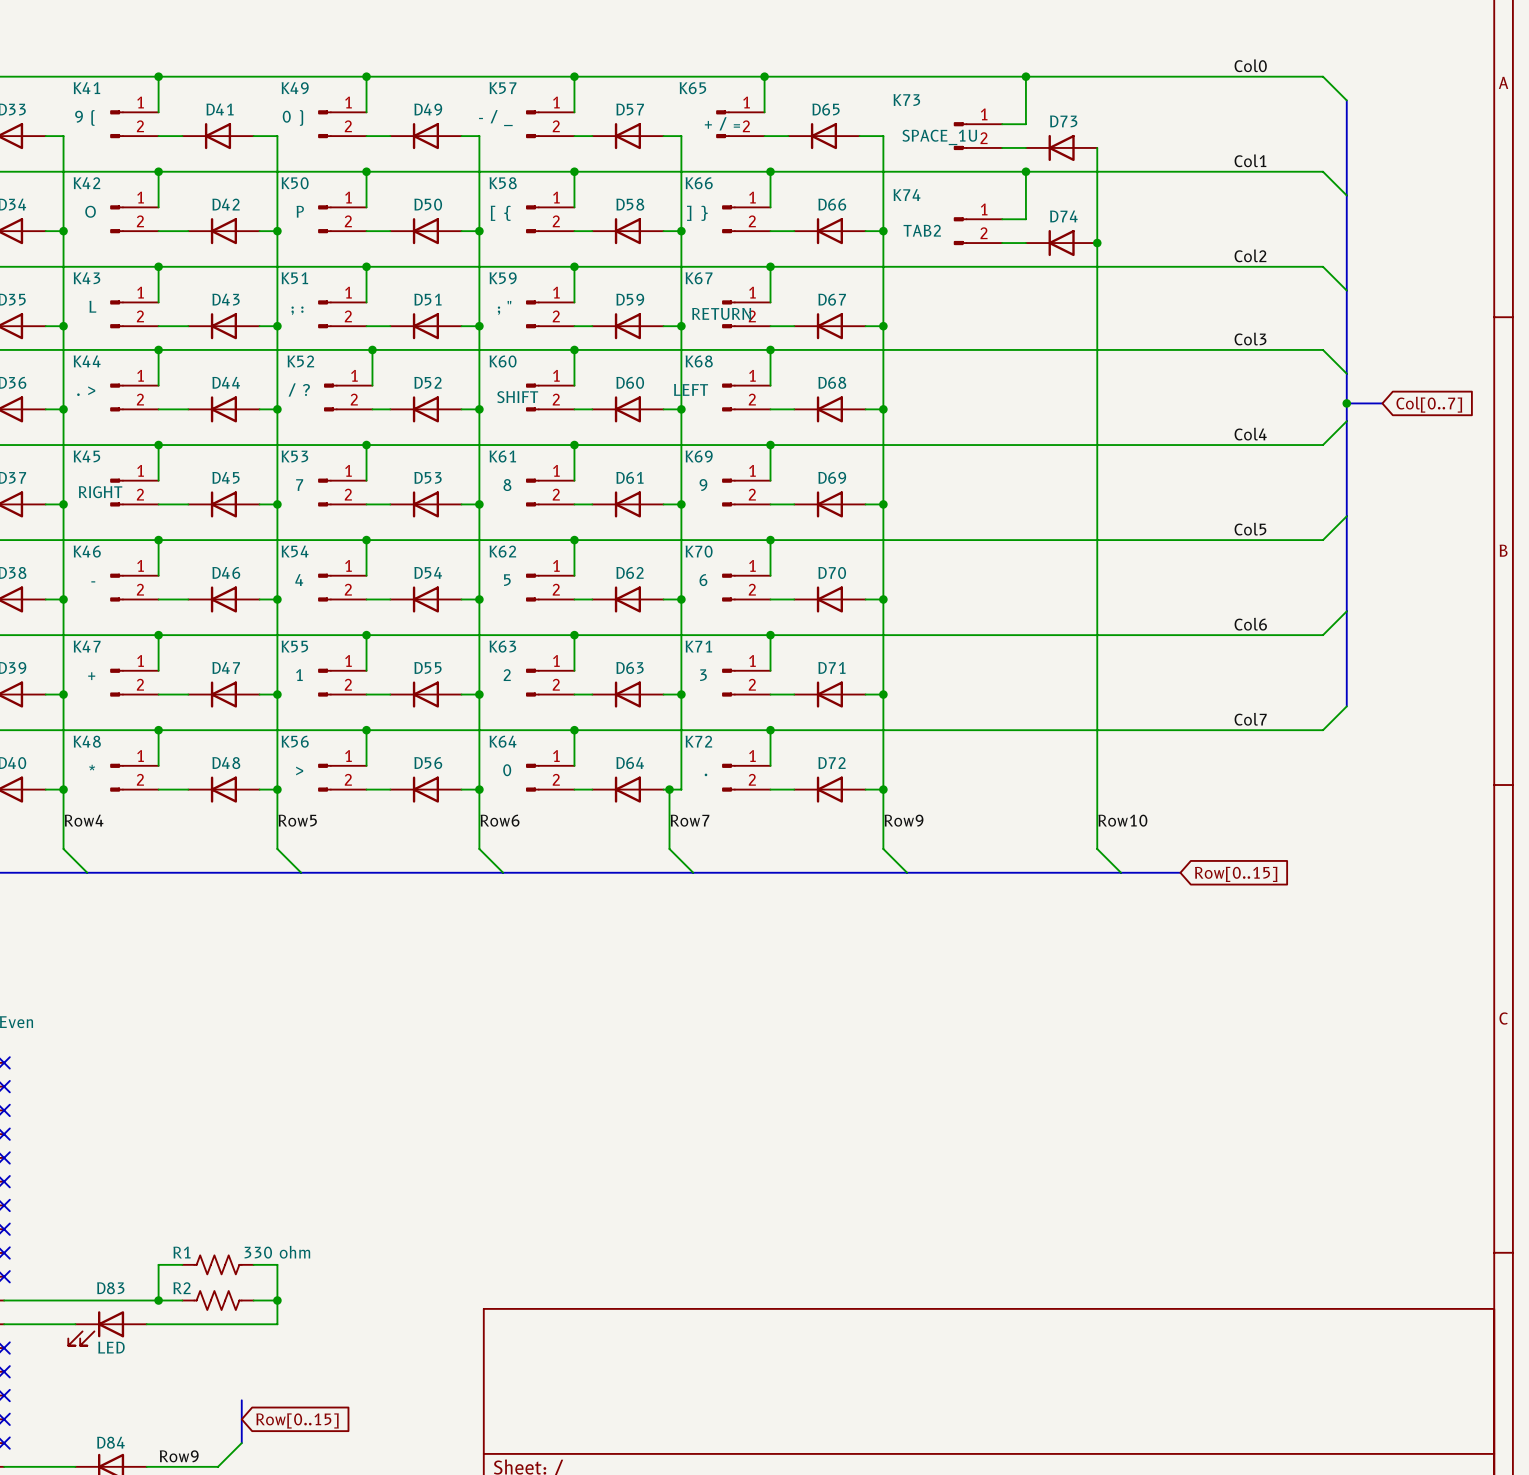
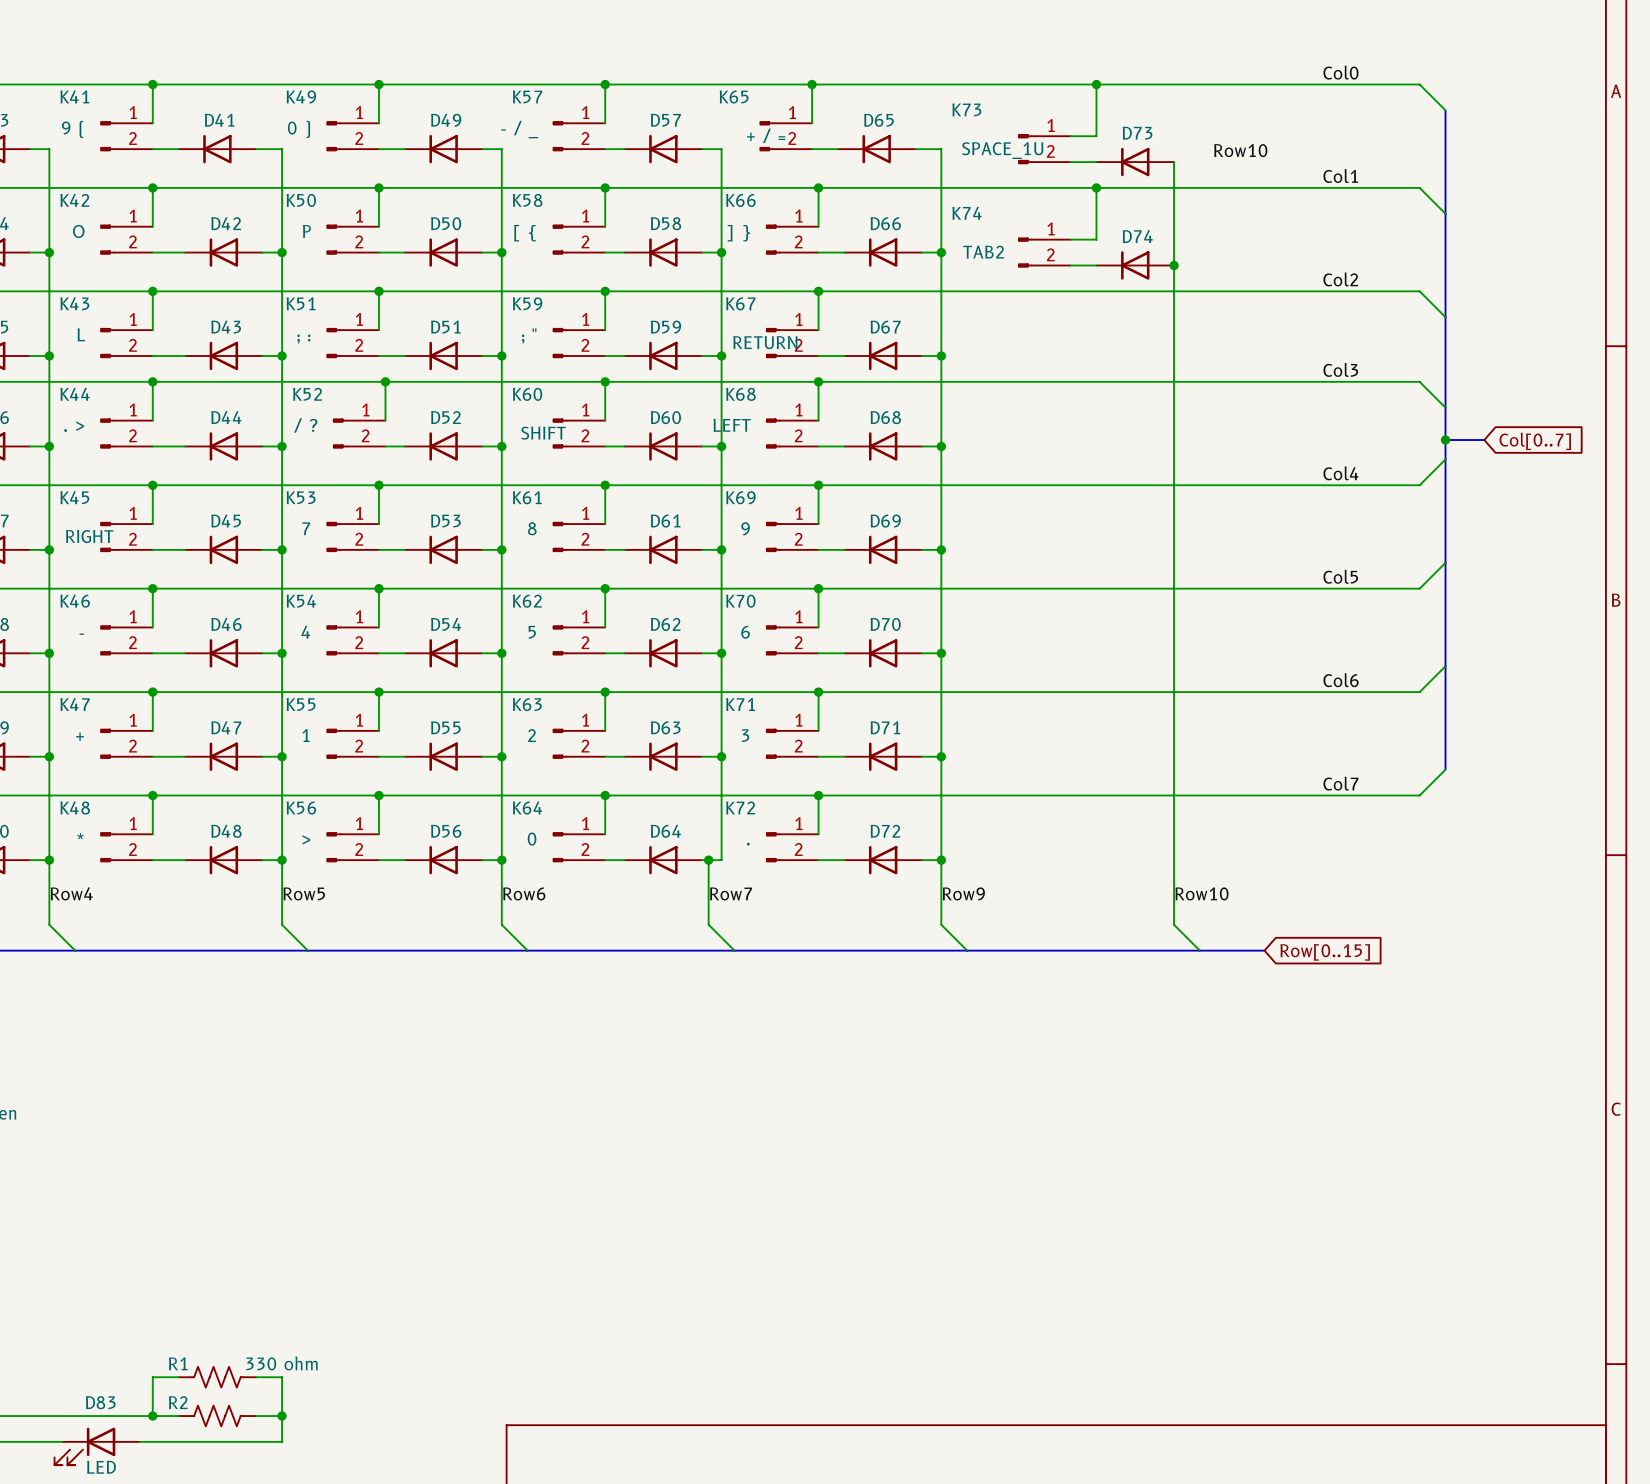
label: none -> Row10 (1240, 150)

